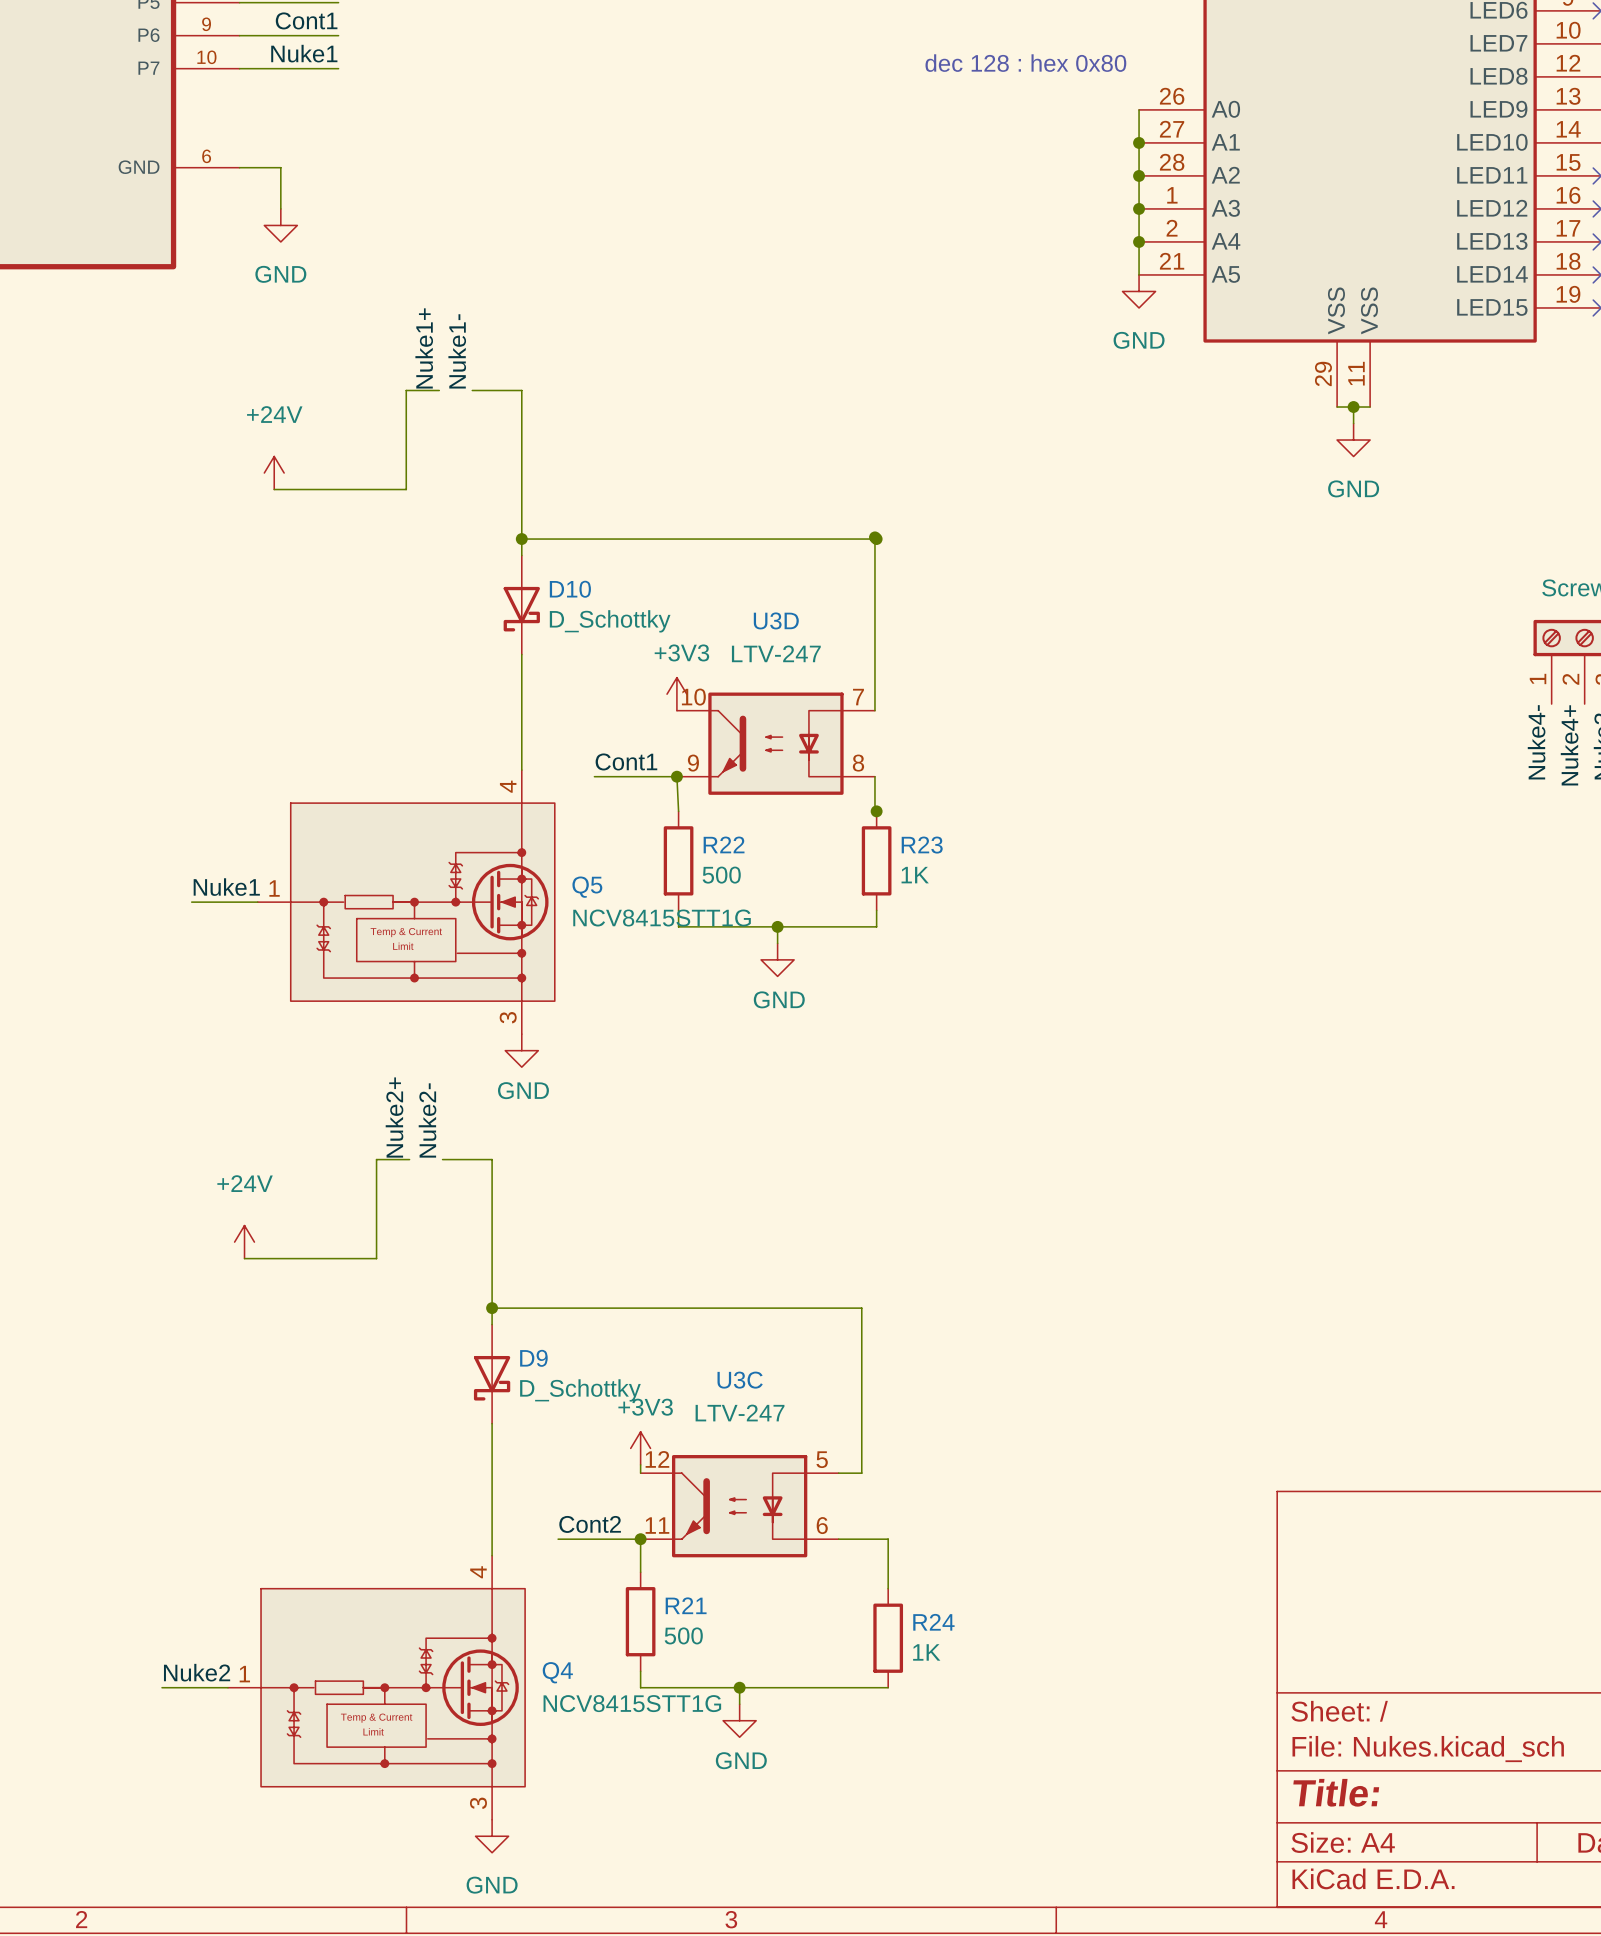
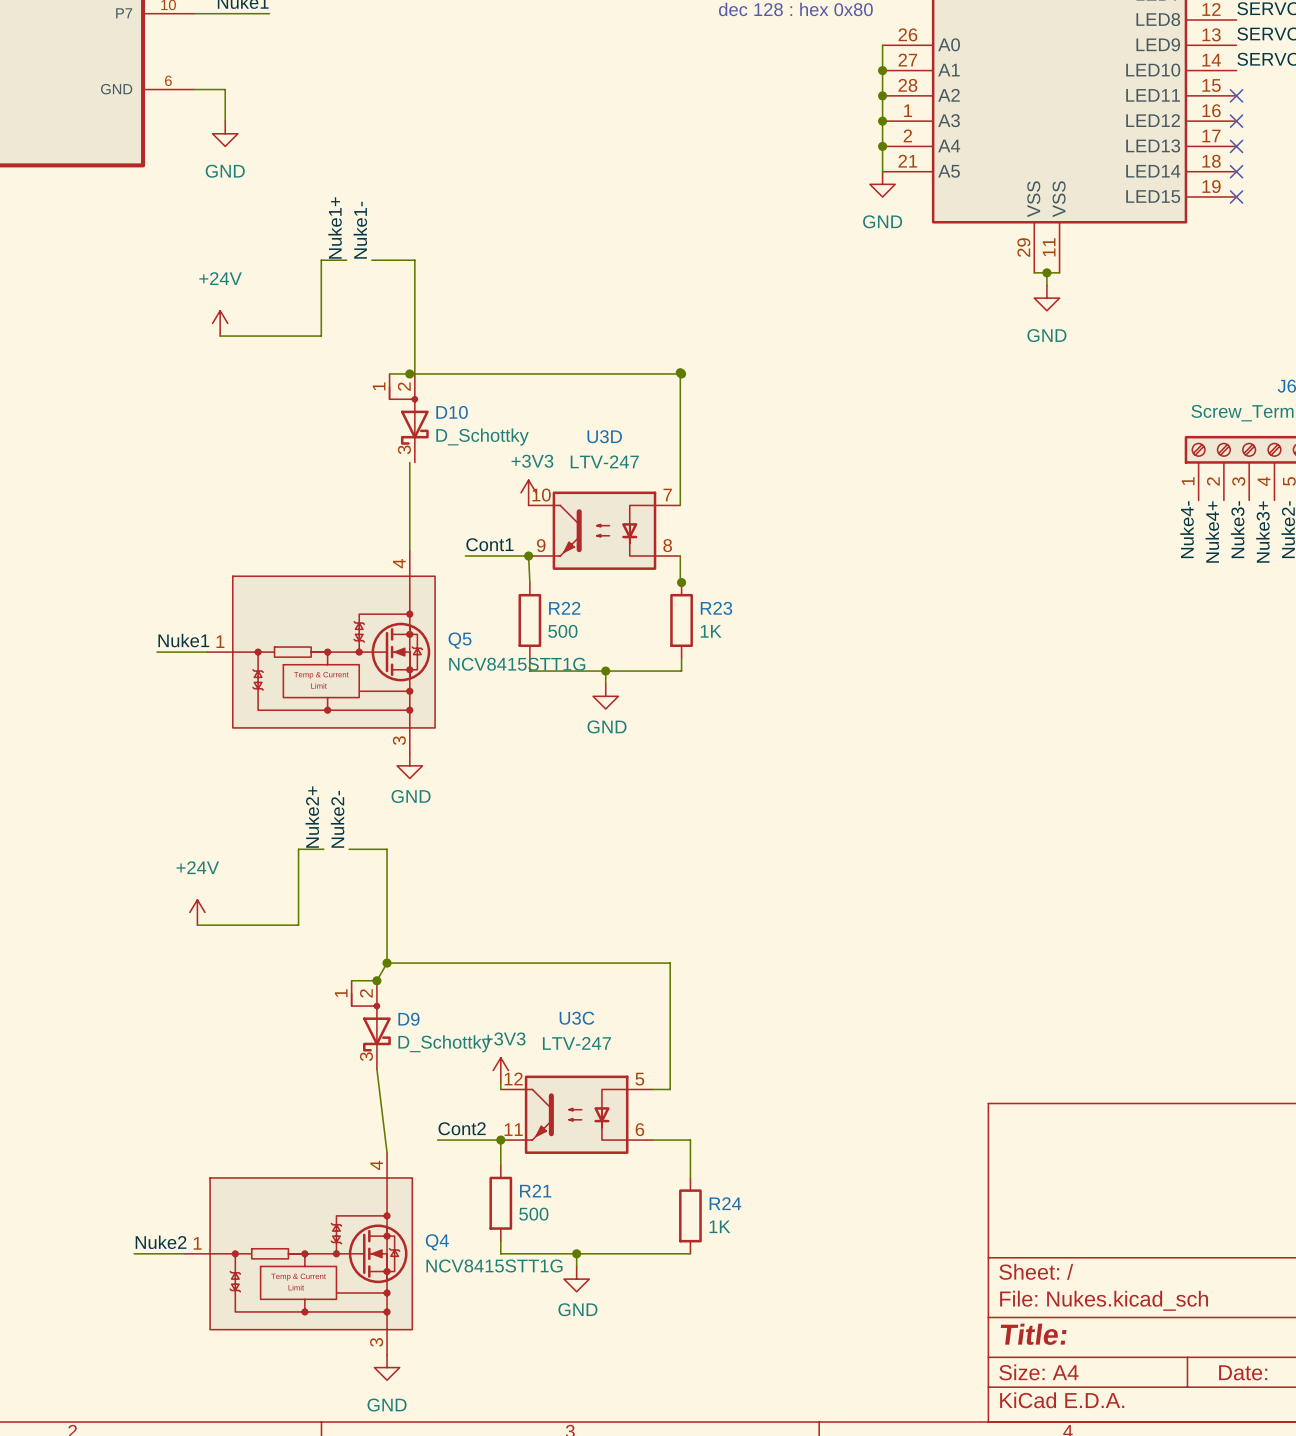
wire: (521, 390) (521, 555) -> (409, 260) (414, 260) (414, 373)
wire: none -> (389, 373) (409, 373)
D10 symbol: [503, 555, 540, 655] -> [389, 373, 429, 463]
wire: (492, 1308) (492, 1324) -> (387, 963) (376, 980) (351, 980)
D9 symbol: [473, 1324, 511, 1424] -> [351, 980, 391, 1070]
junction: none -> (376, 980)
wire: (492, 1423) (492, 1555) -> (376, 1069) (387, 1152)

